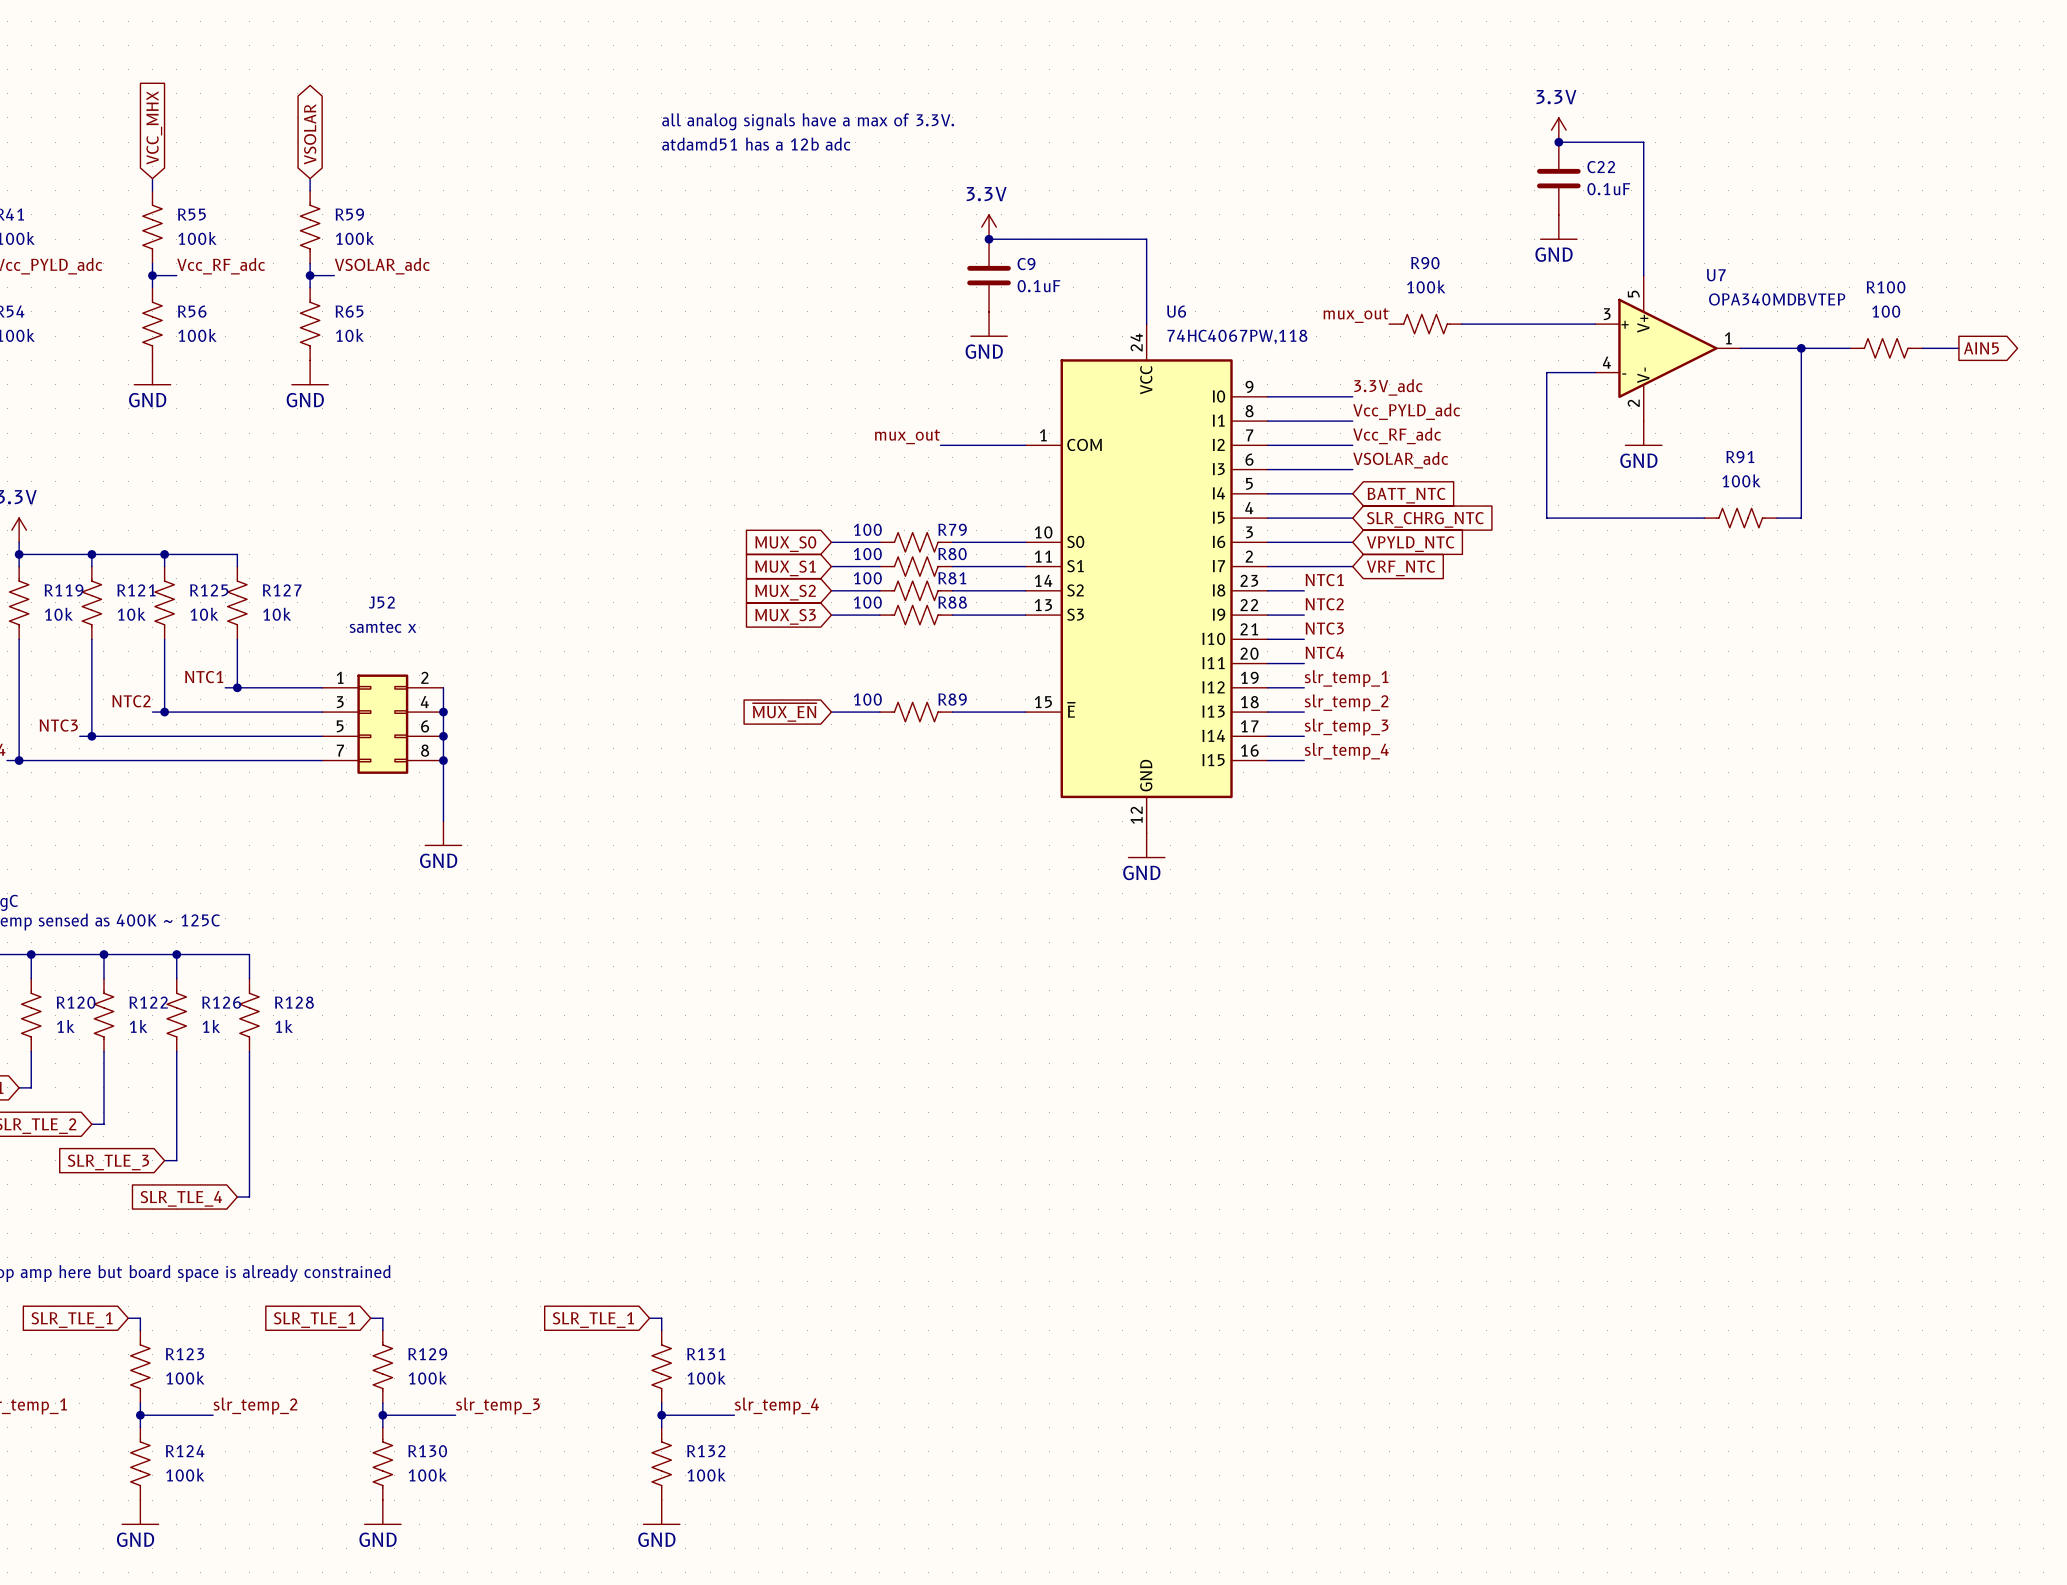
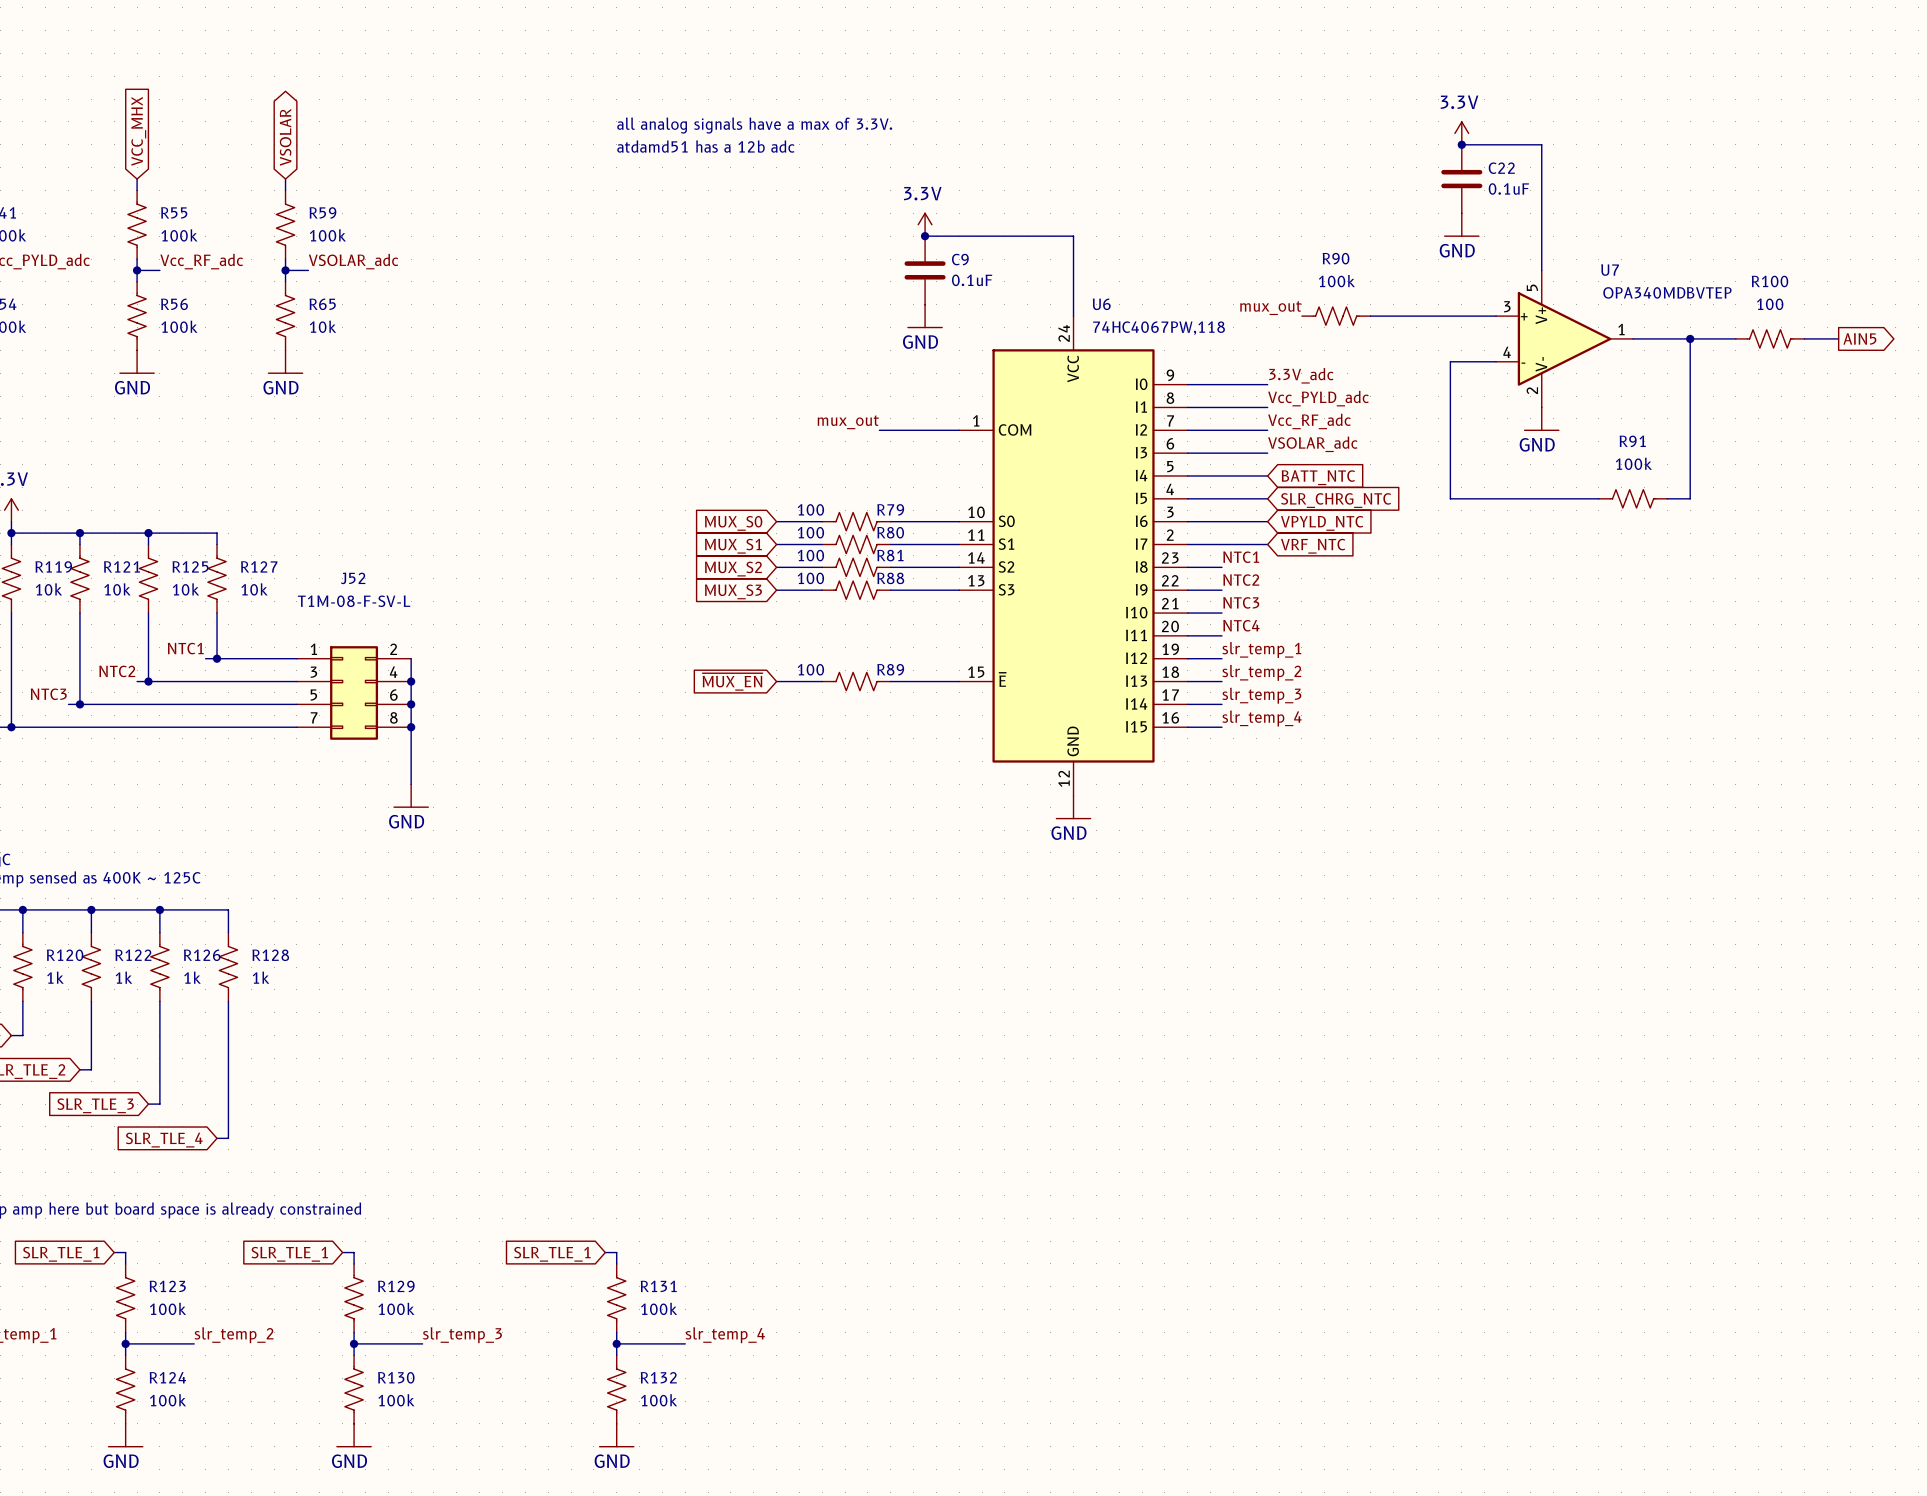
J52 value: samtec x (383, 627) -> T1M-08-F-SV-L (354, 601)

